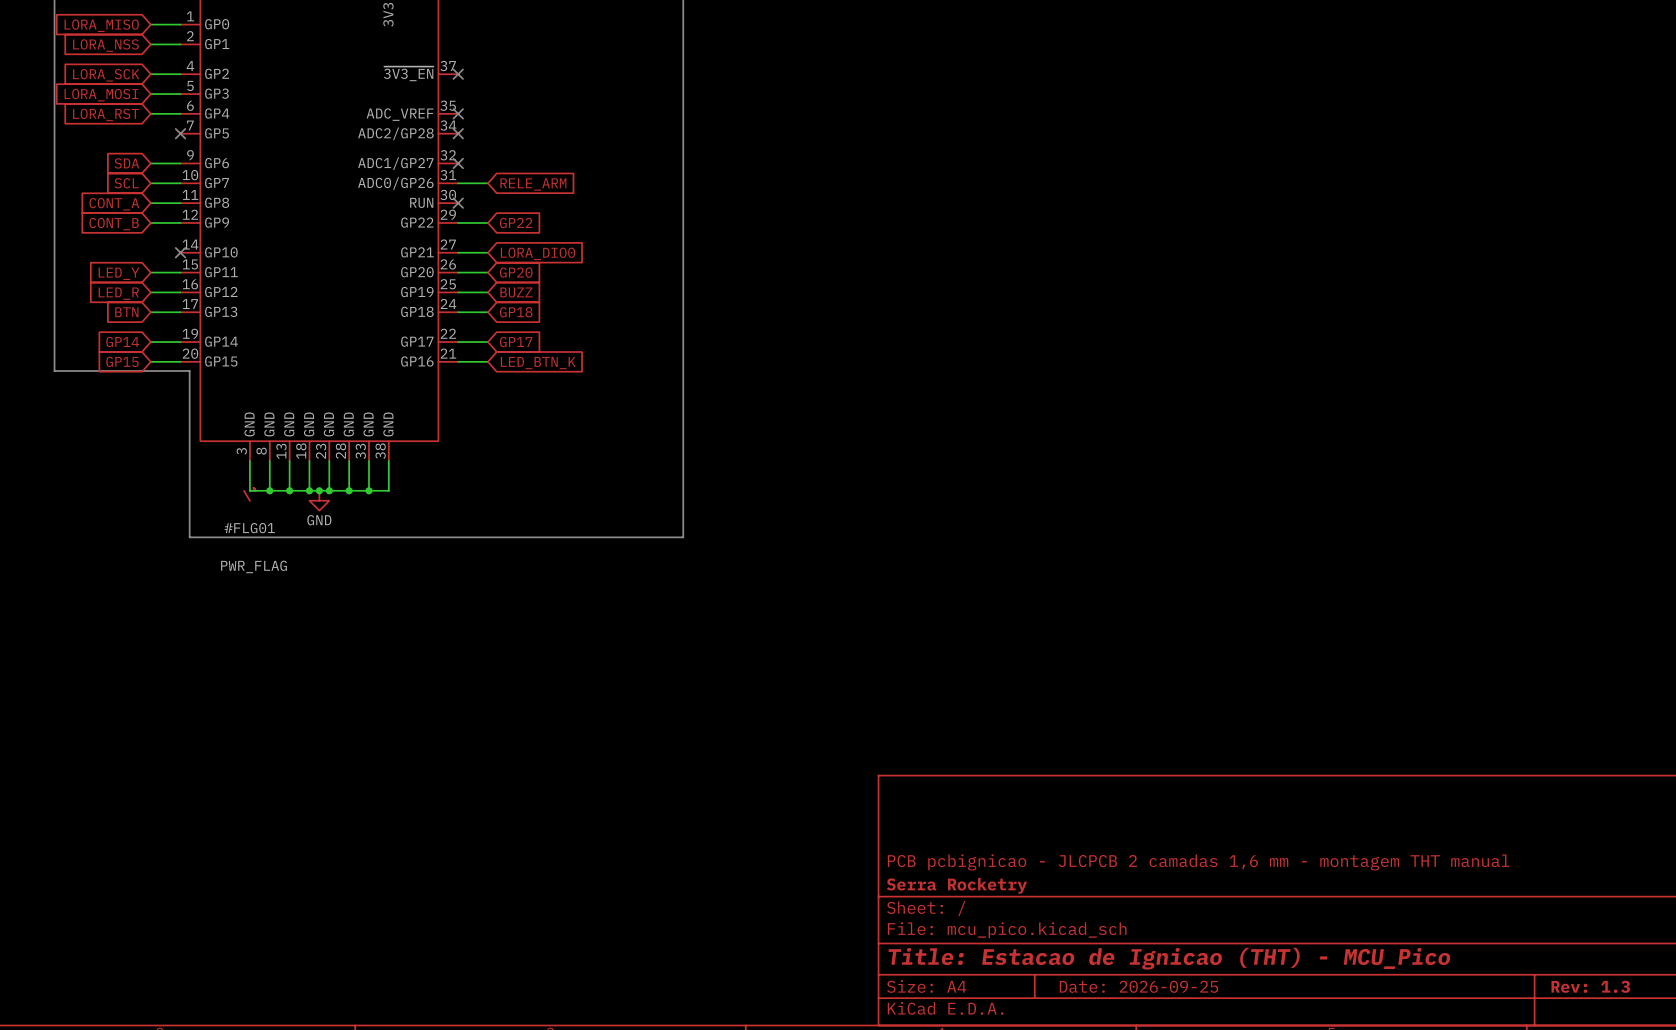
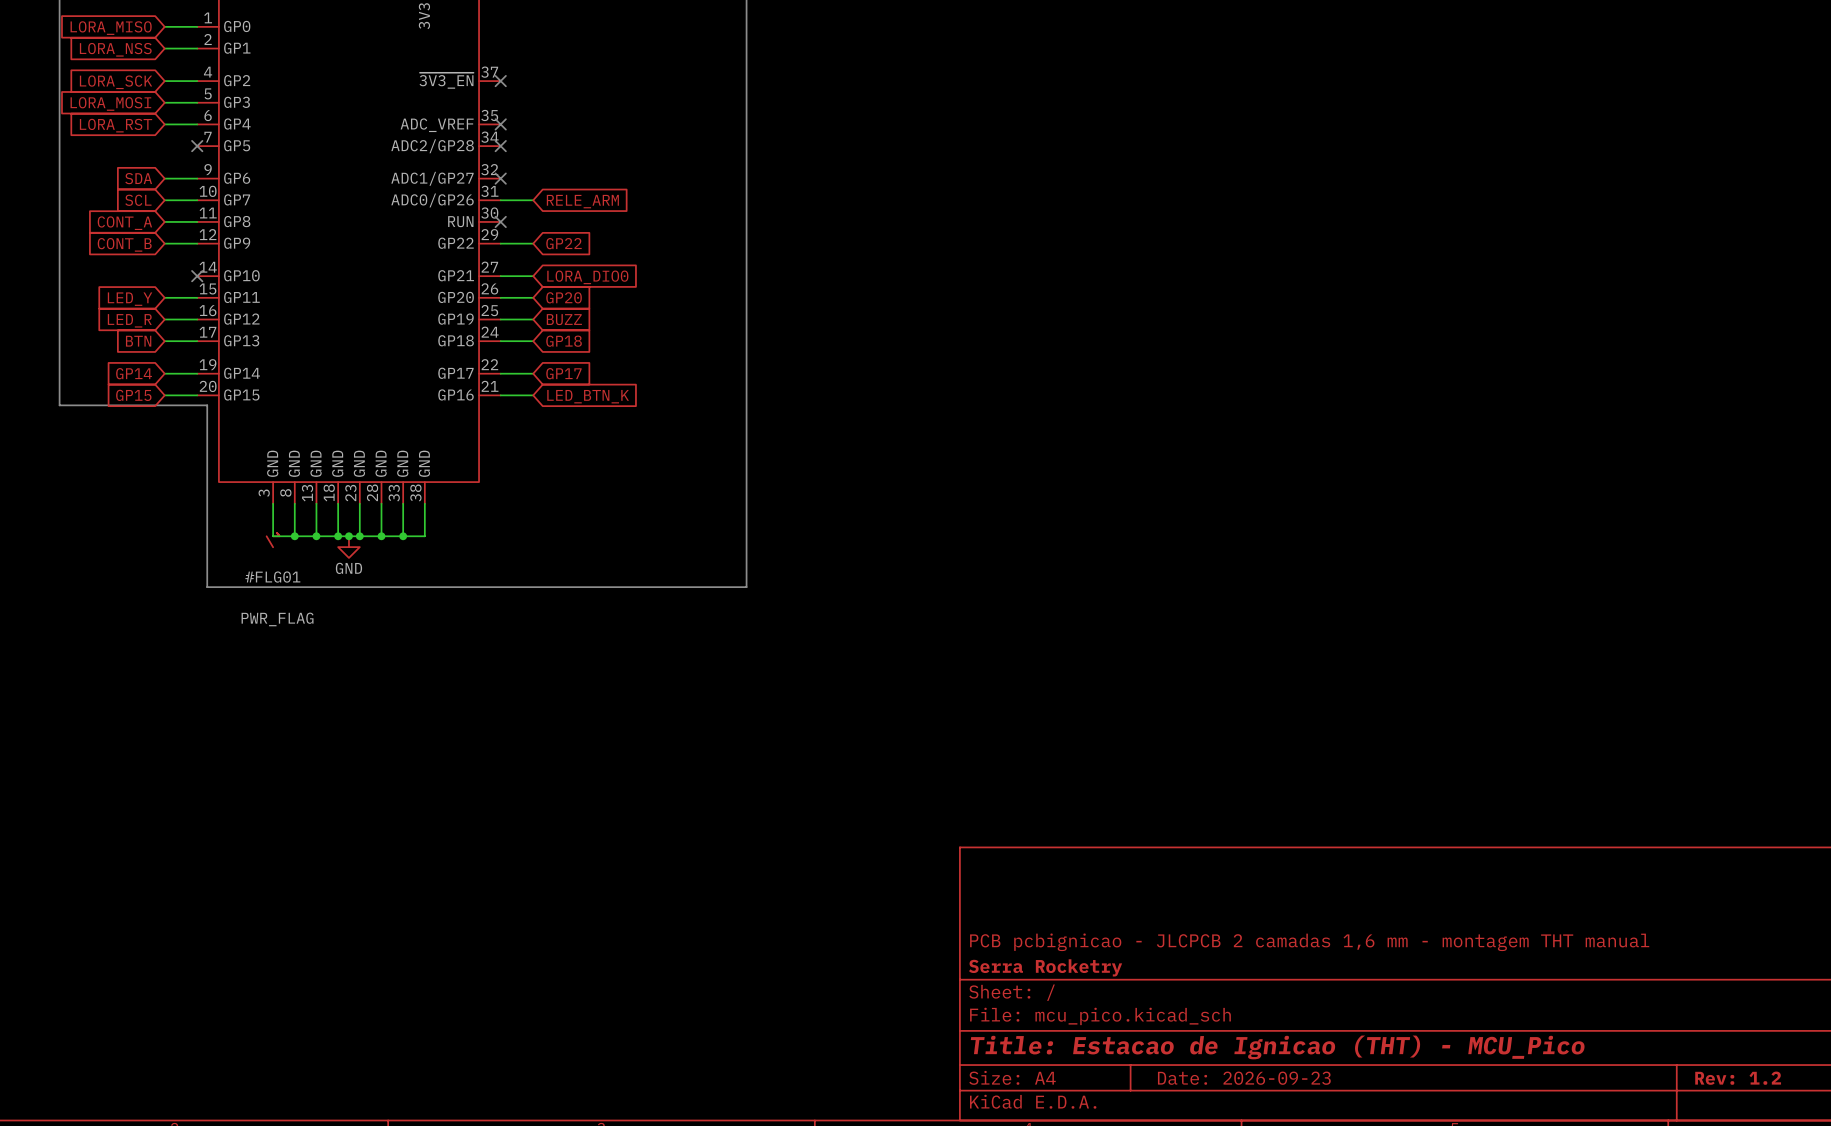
title block: Date: 2026-09-25 (1138, 986) -> Date: 2026-09-23 (1244, 1078)
title block: Rev: 1.3 (1590, 986) -> Rev: 1.2 (1738, 1078)

